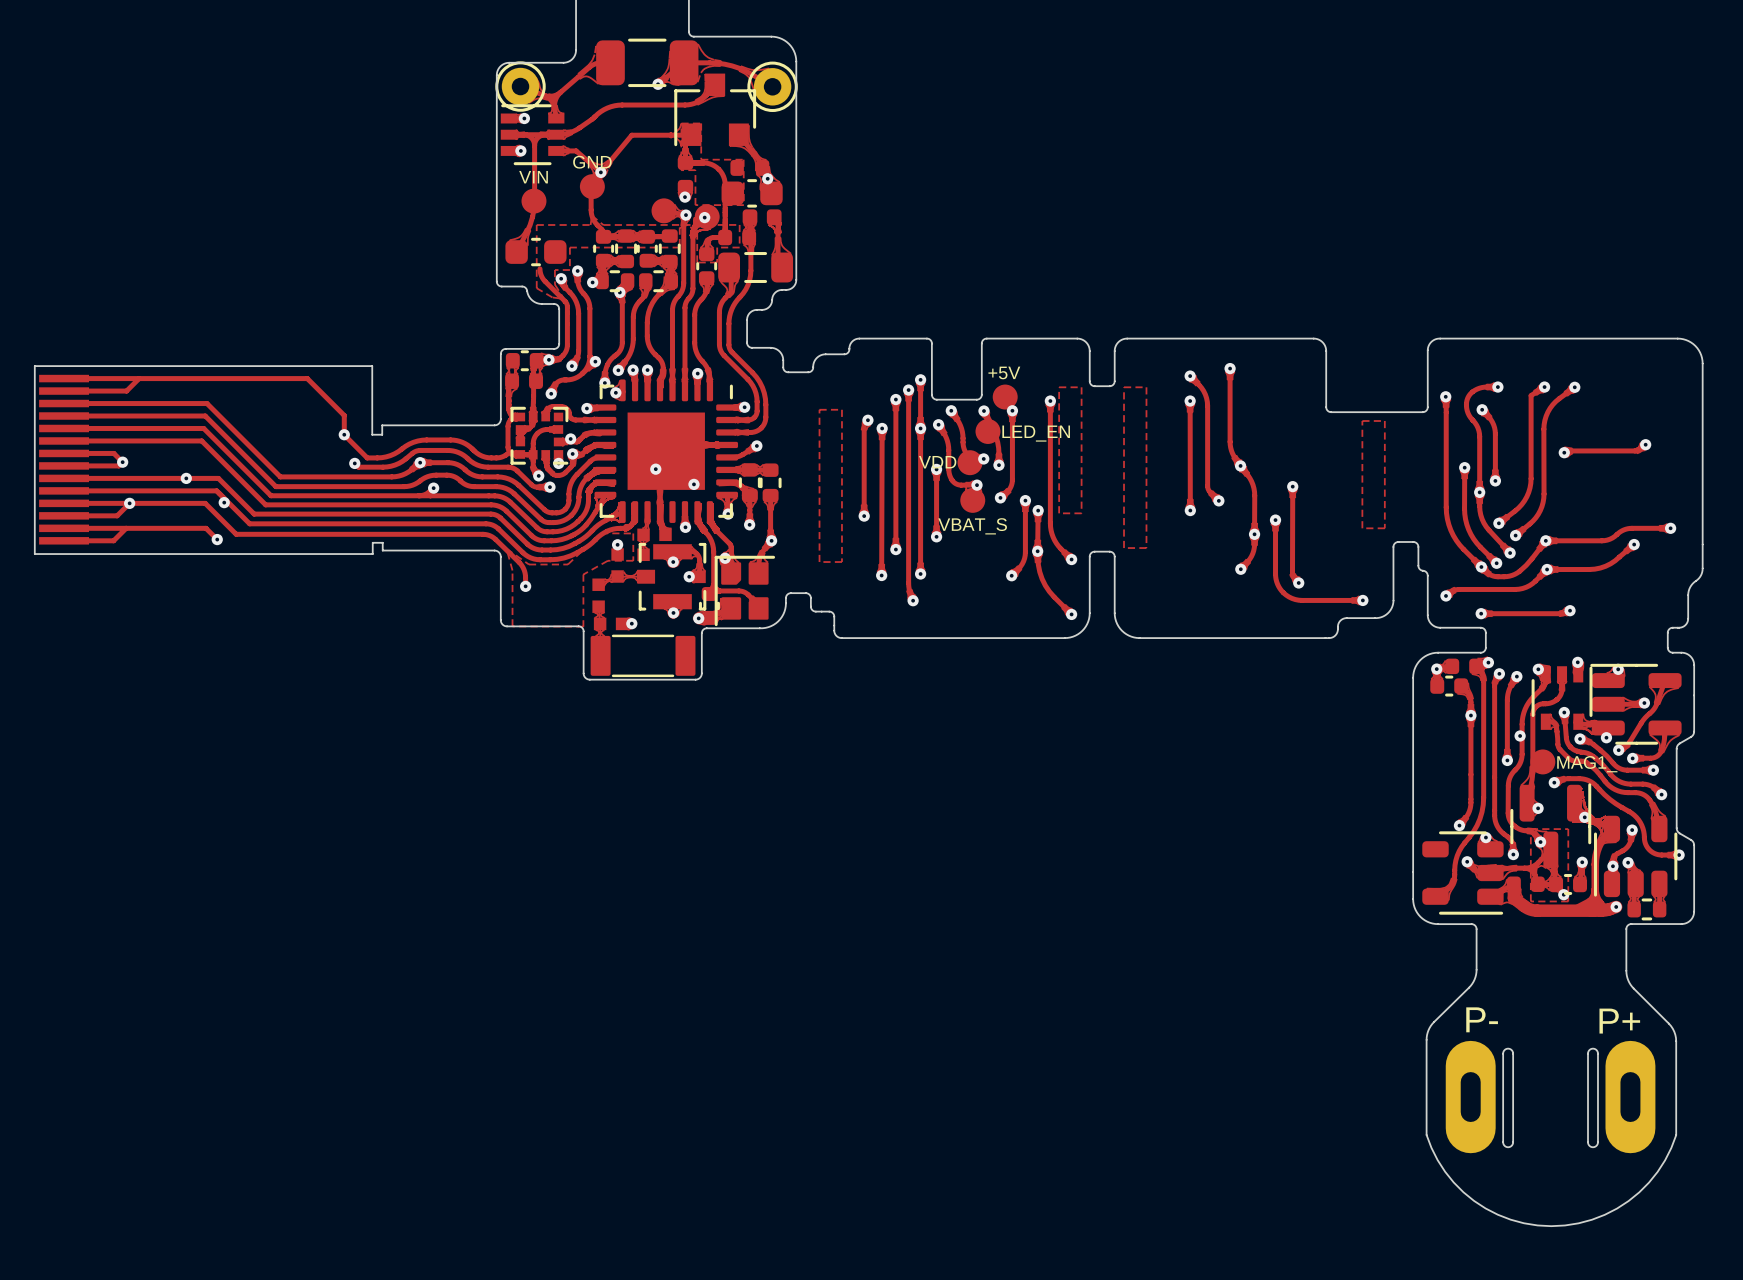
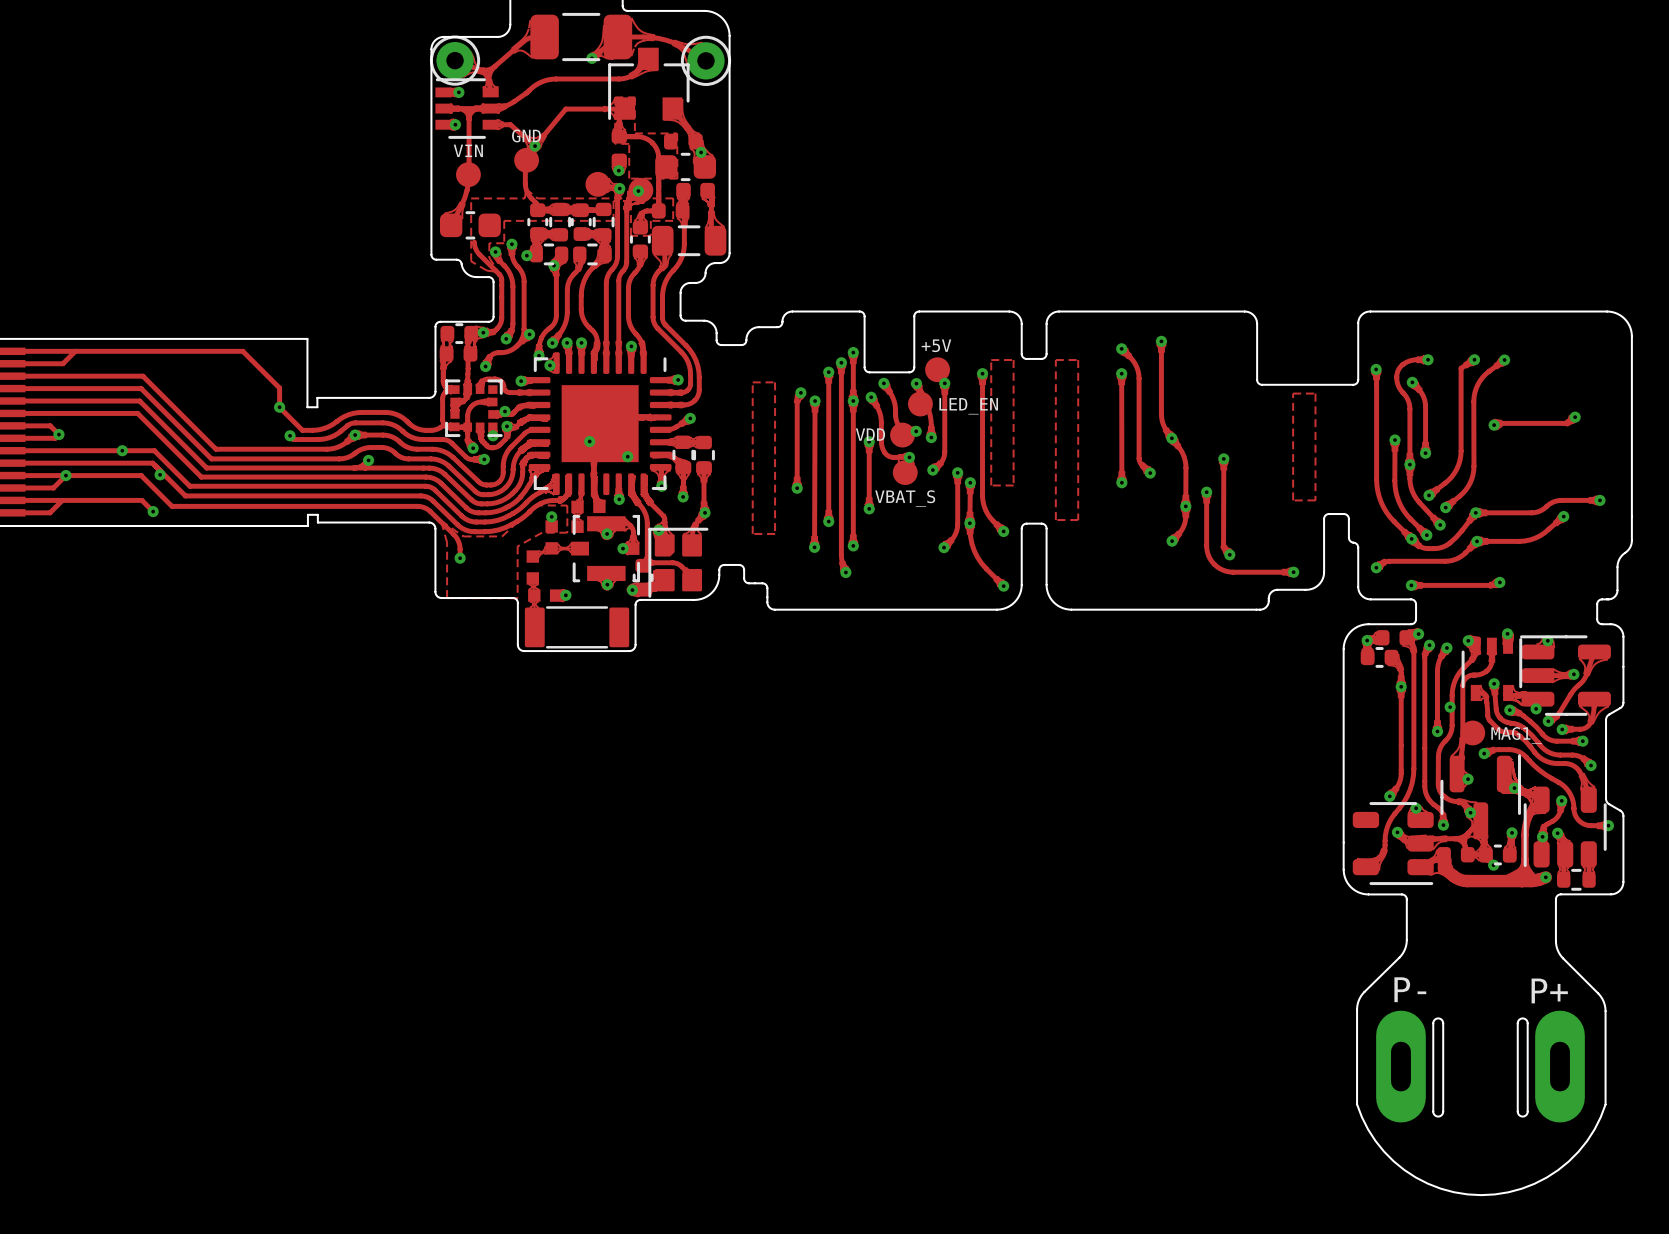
zone outline: (1530, 829) (1530, 901) (1568, 901) (1568, 829) (1530, 829) -> none

